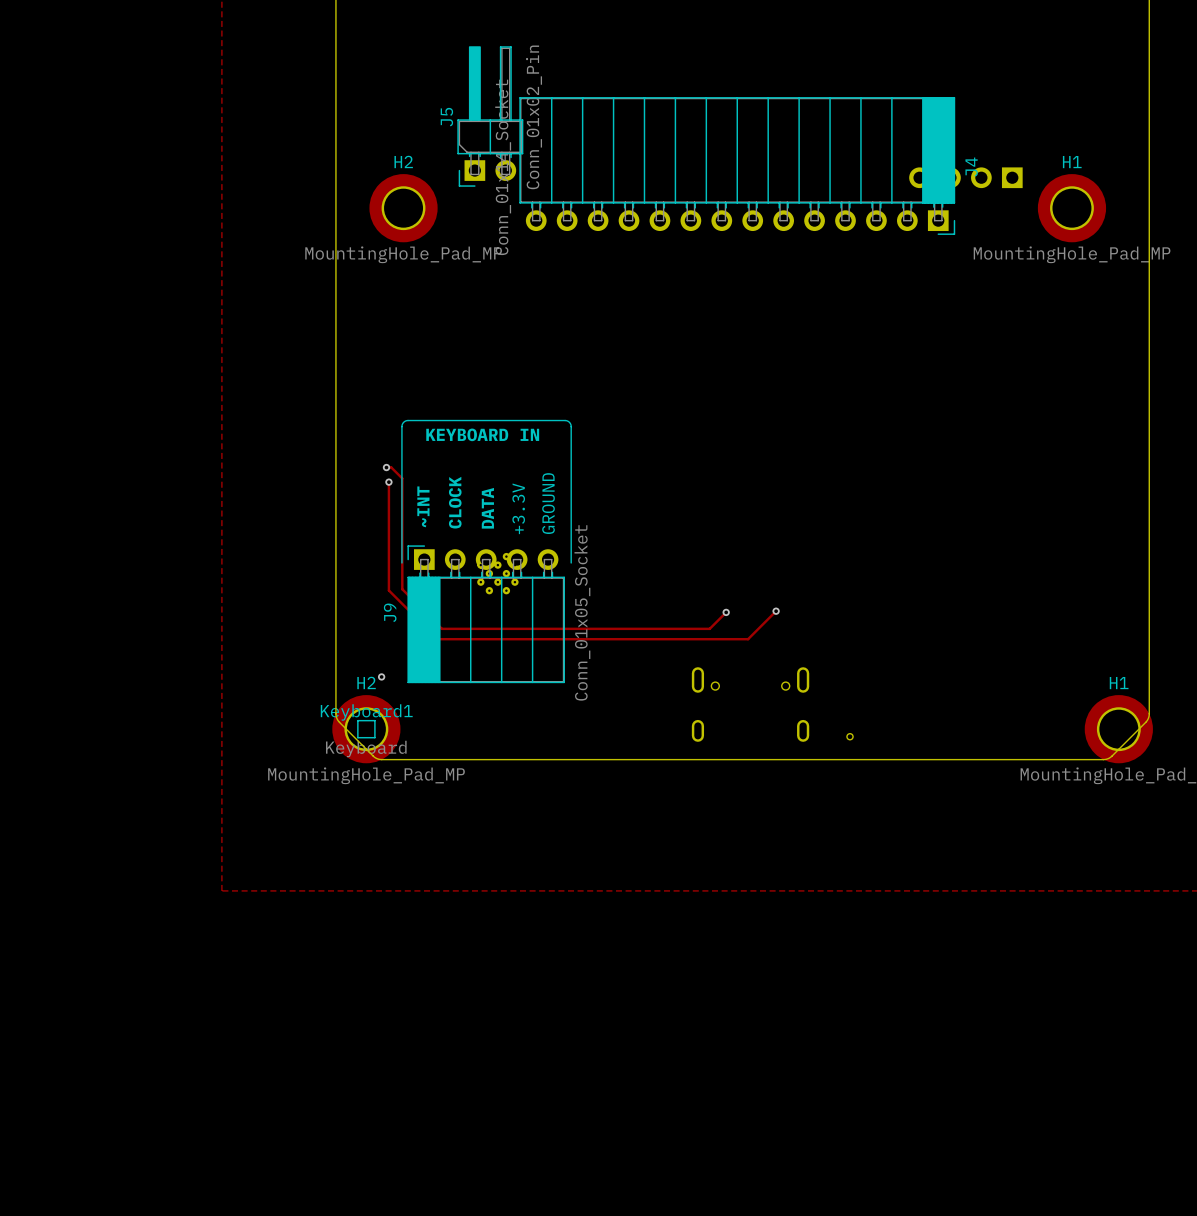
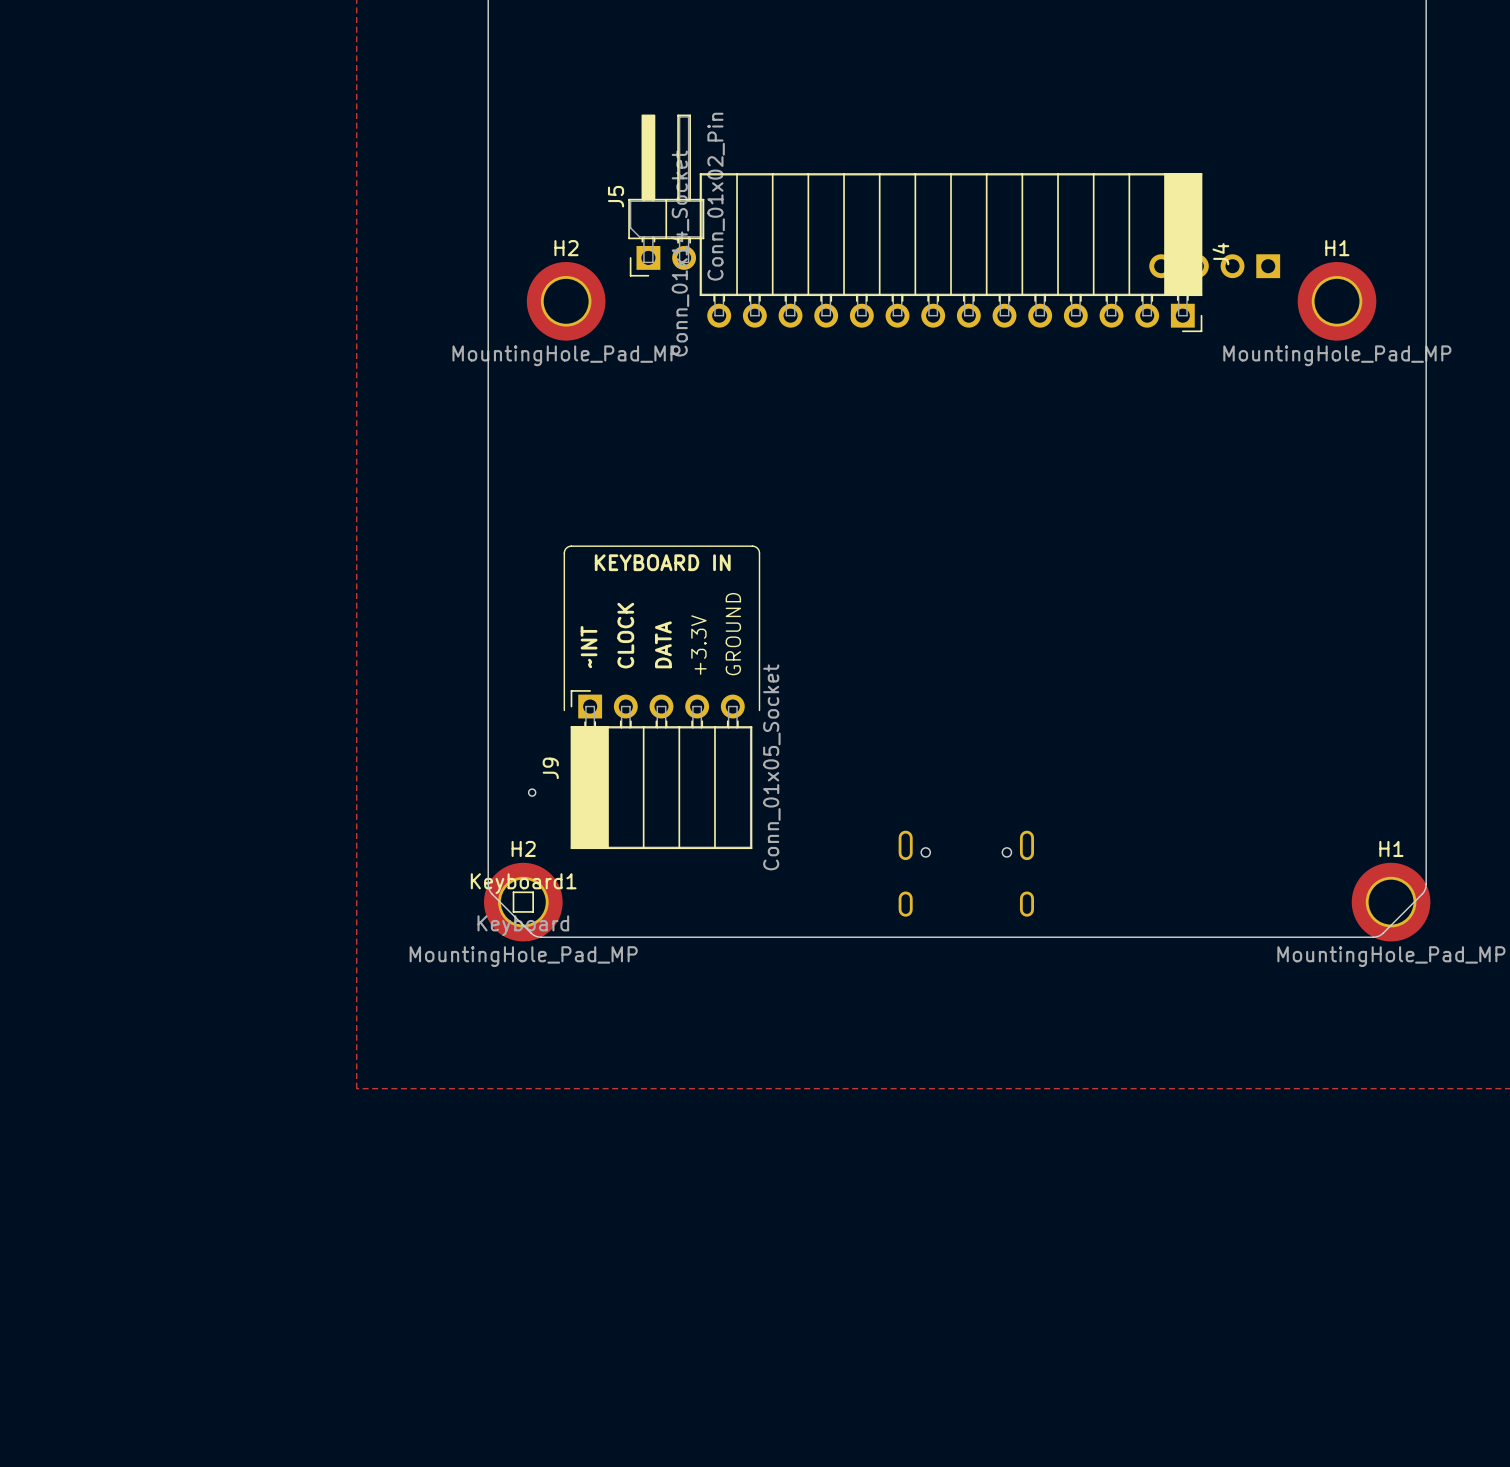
track: (386, 467) (391, 467) (402, 478) (402, 589) (441, 628) (709, 628) (726, 612) -> none
via: (386, 467) -> none
track: (388, 482) (388, 590) (437, 639) (748, 639) (776, 611) -> none
via: (388, 482) -> none
part: (497, 573) -> none
via: (776, 611) -> none
via: (726, 612) -> none
part: none -> (532, 792)
via: (381, 676) -> none
part: (850, 736) -> none

